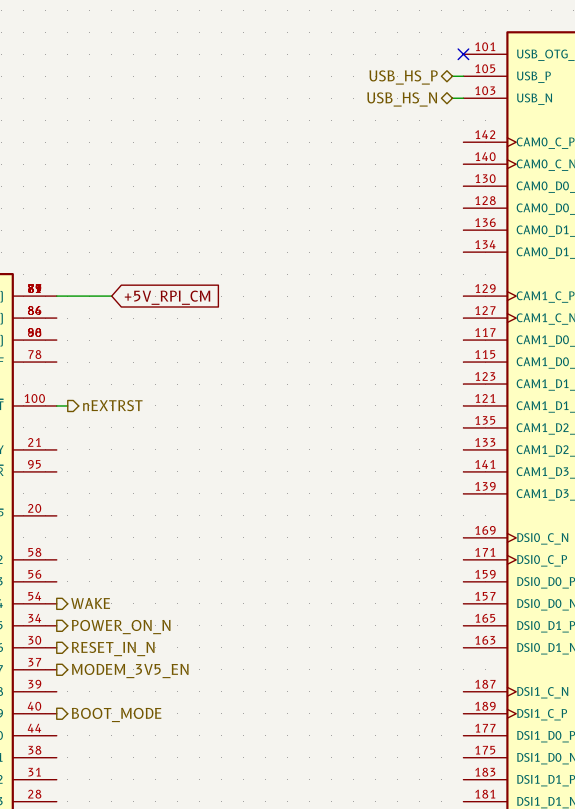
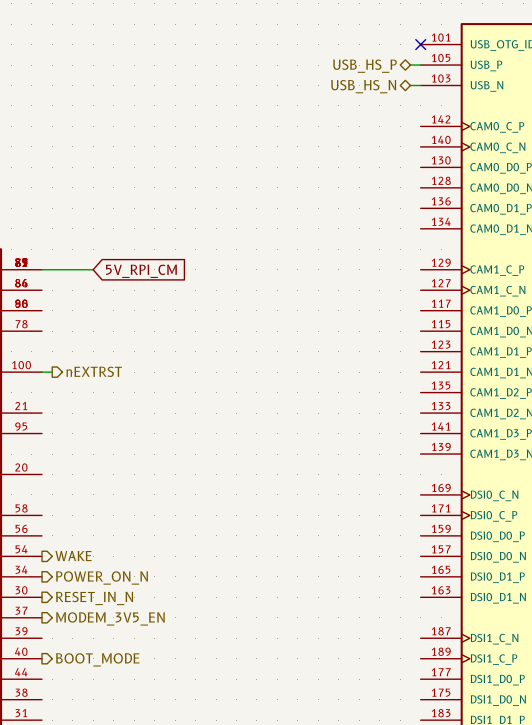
global label: +5V_RPI_CM (167, 297) -> 5V_RPI_CM (141, 271)

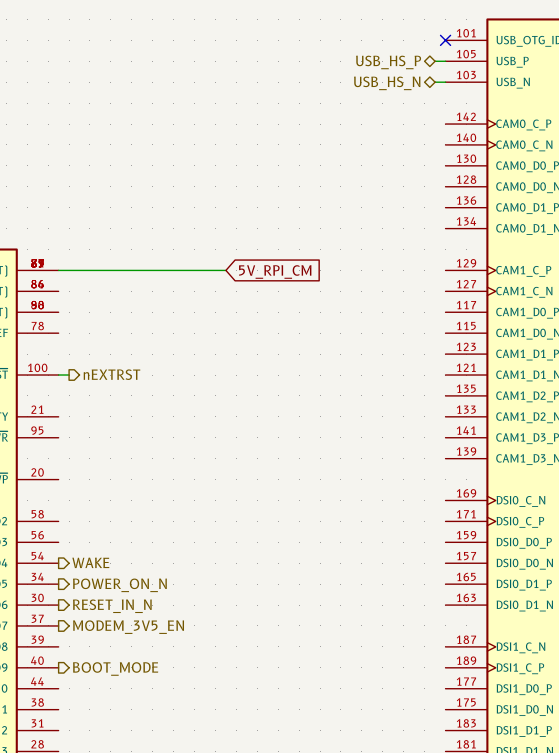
wire: none -> (110, 270) (225, 270)
global label position: 5V_RPI_CM (141, 271) -> 5V_RPI_CM (275, 271)

